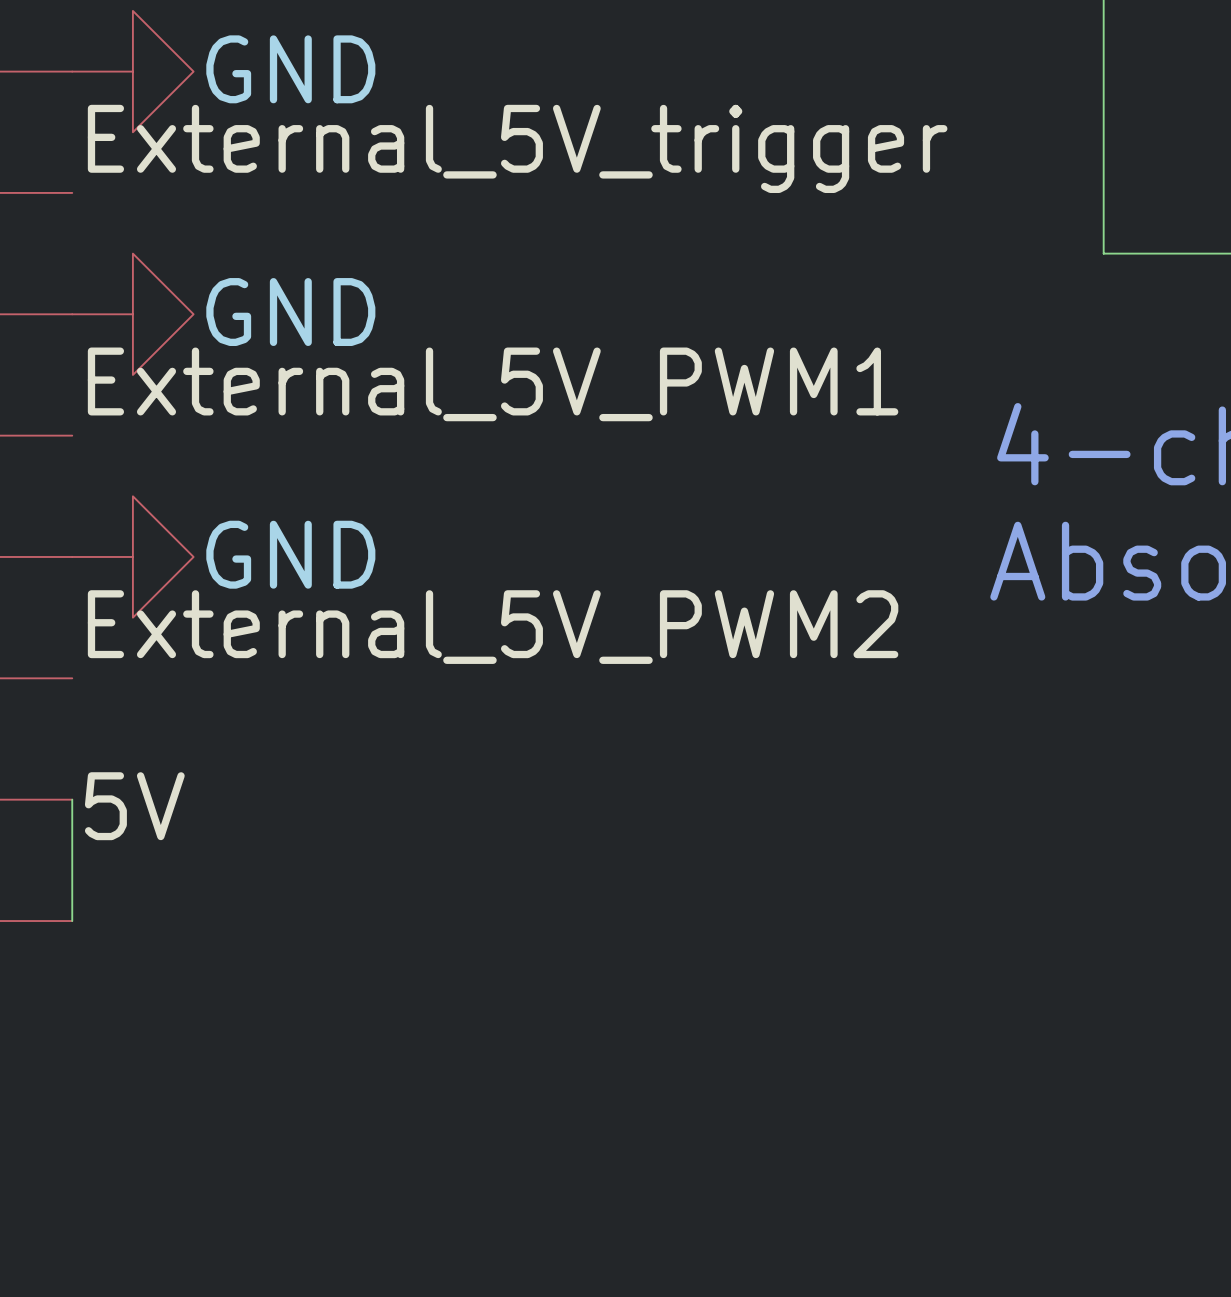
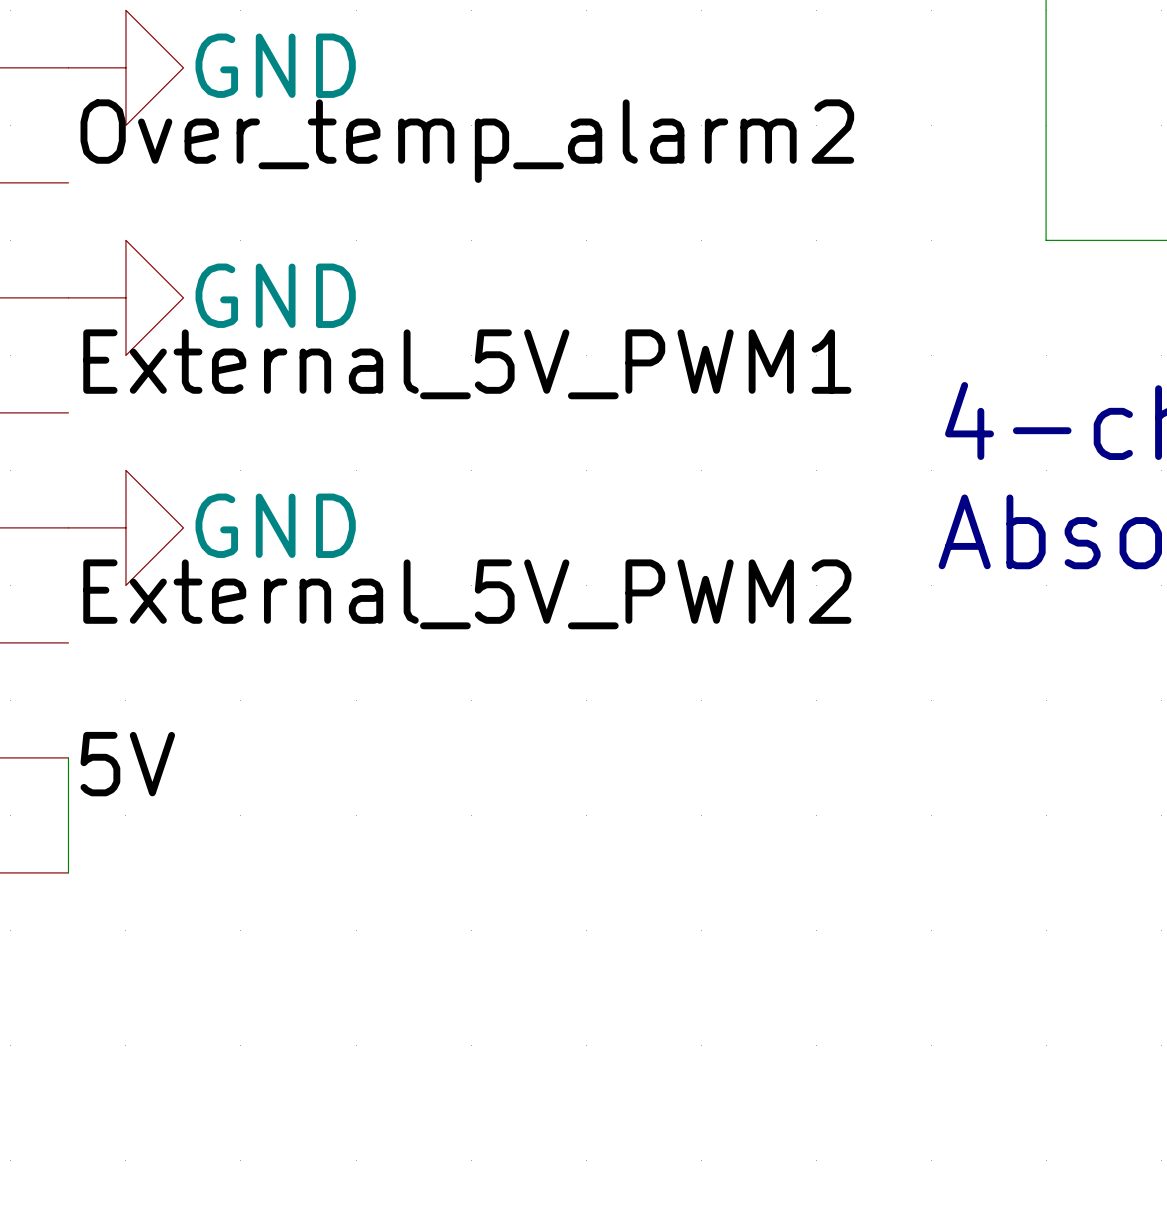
label: External_5V_trigger (517, 148) -> Over_temp_alarm2 (467, 141)

